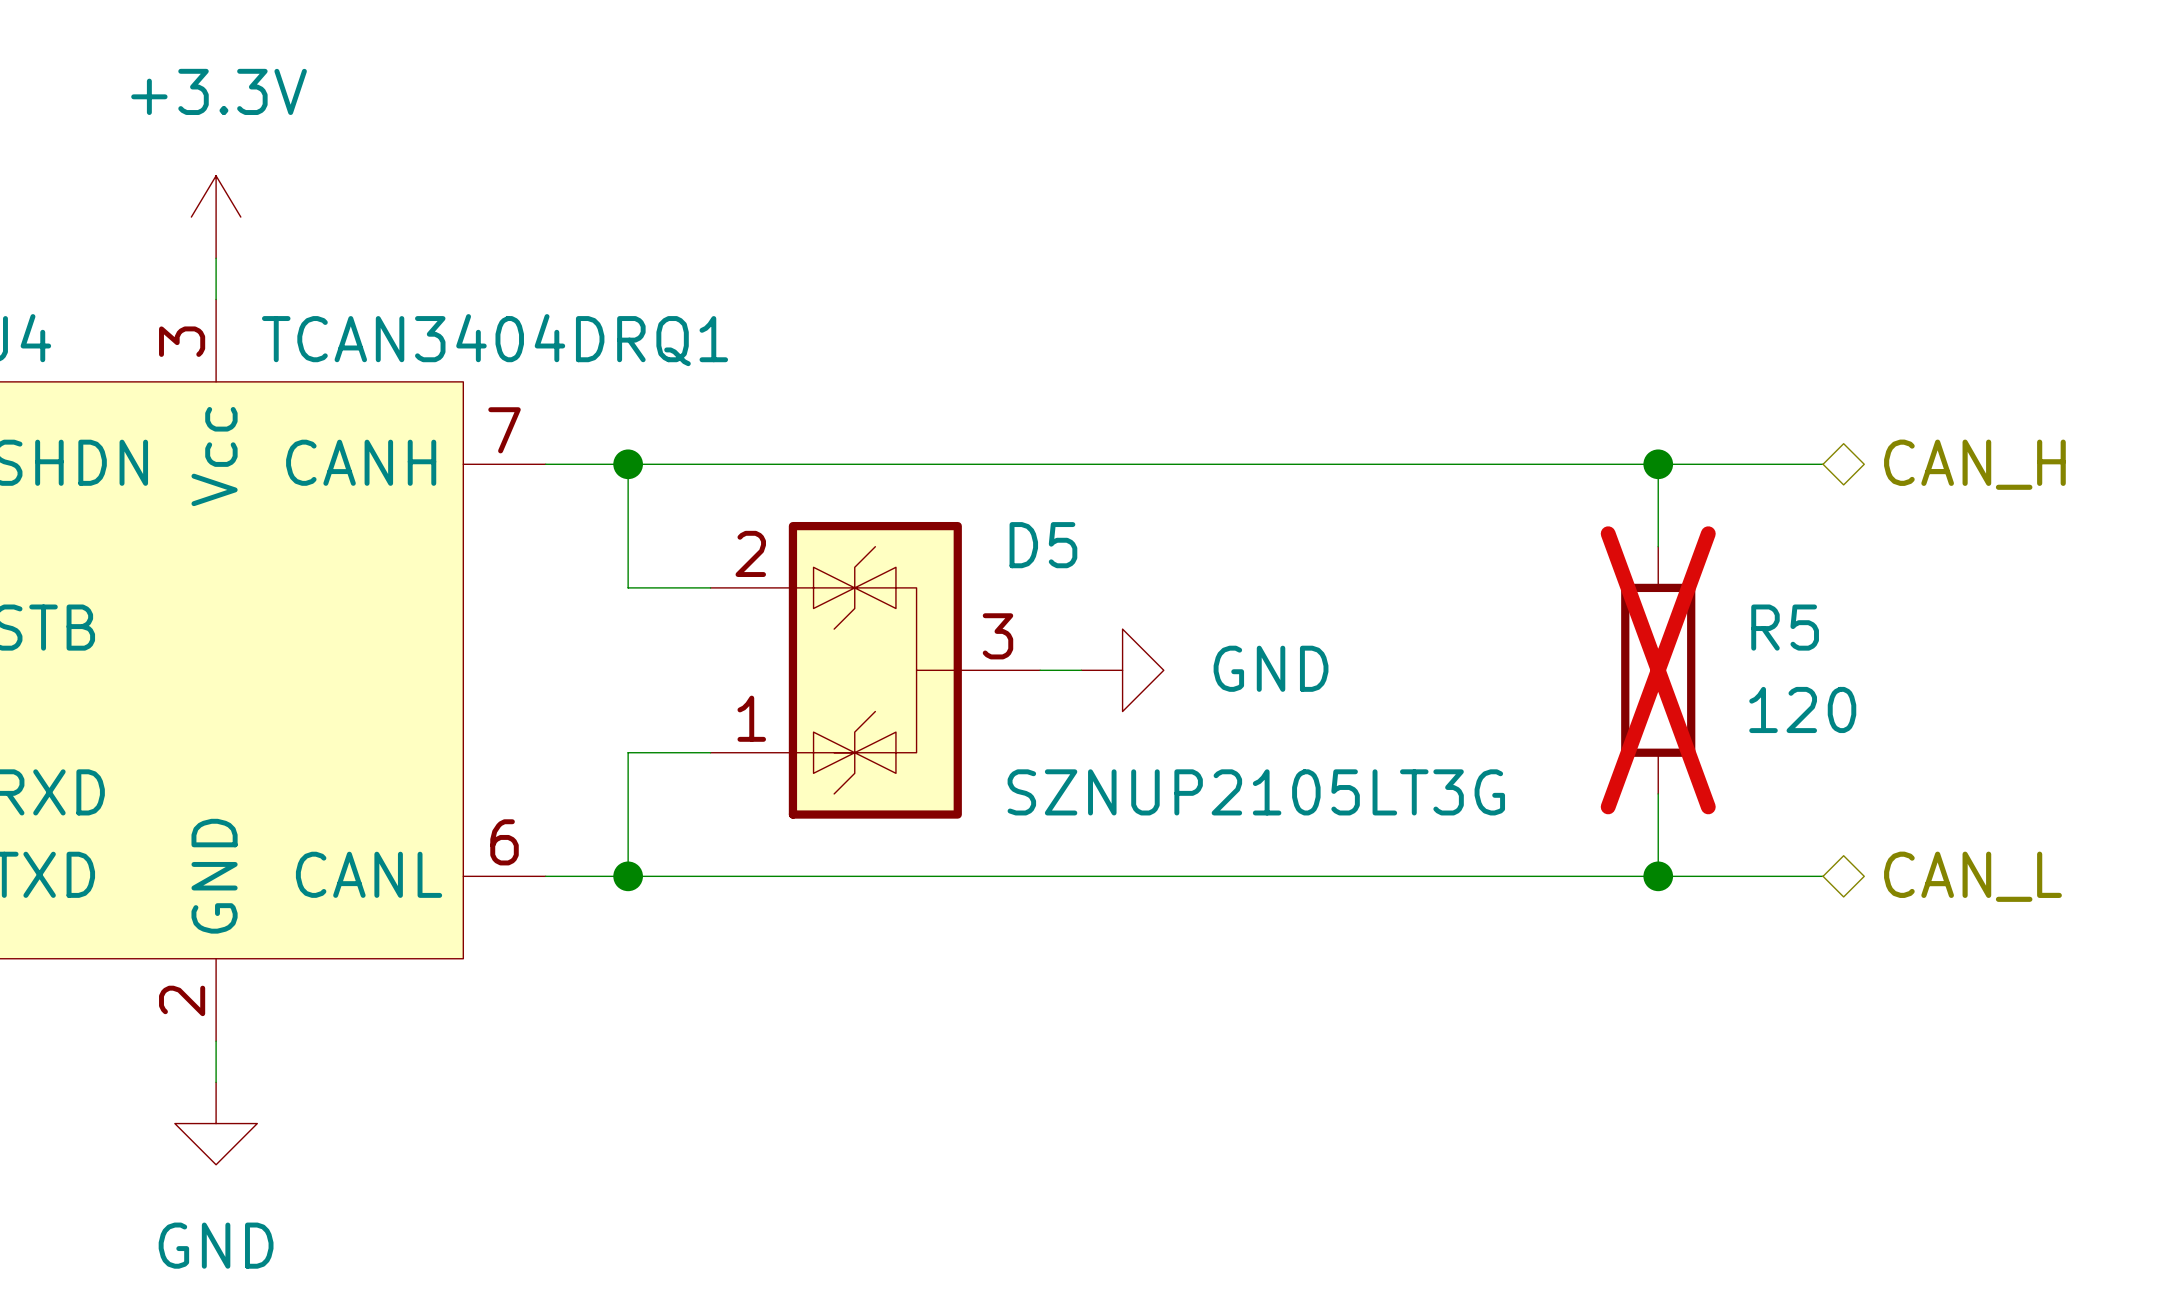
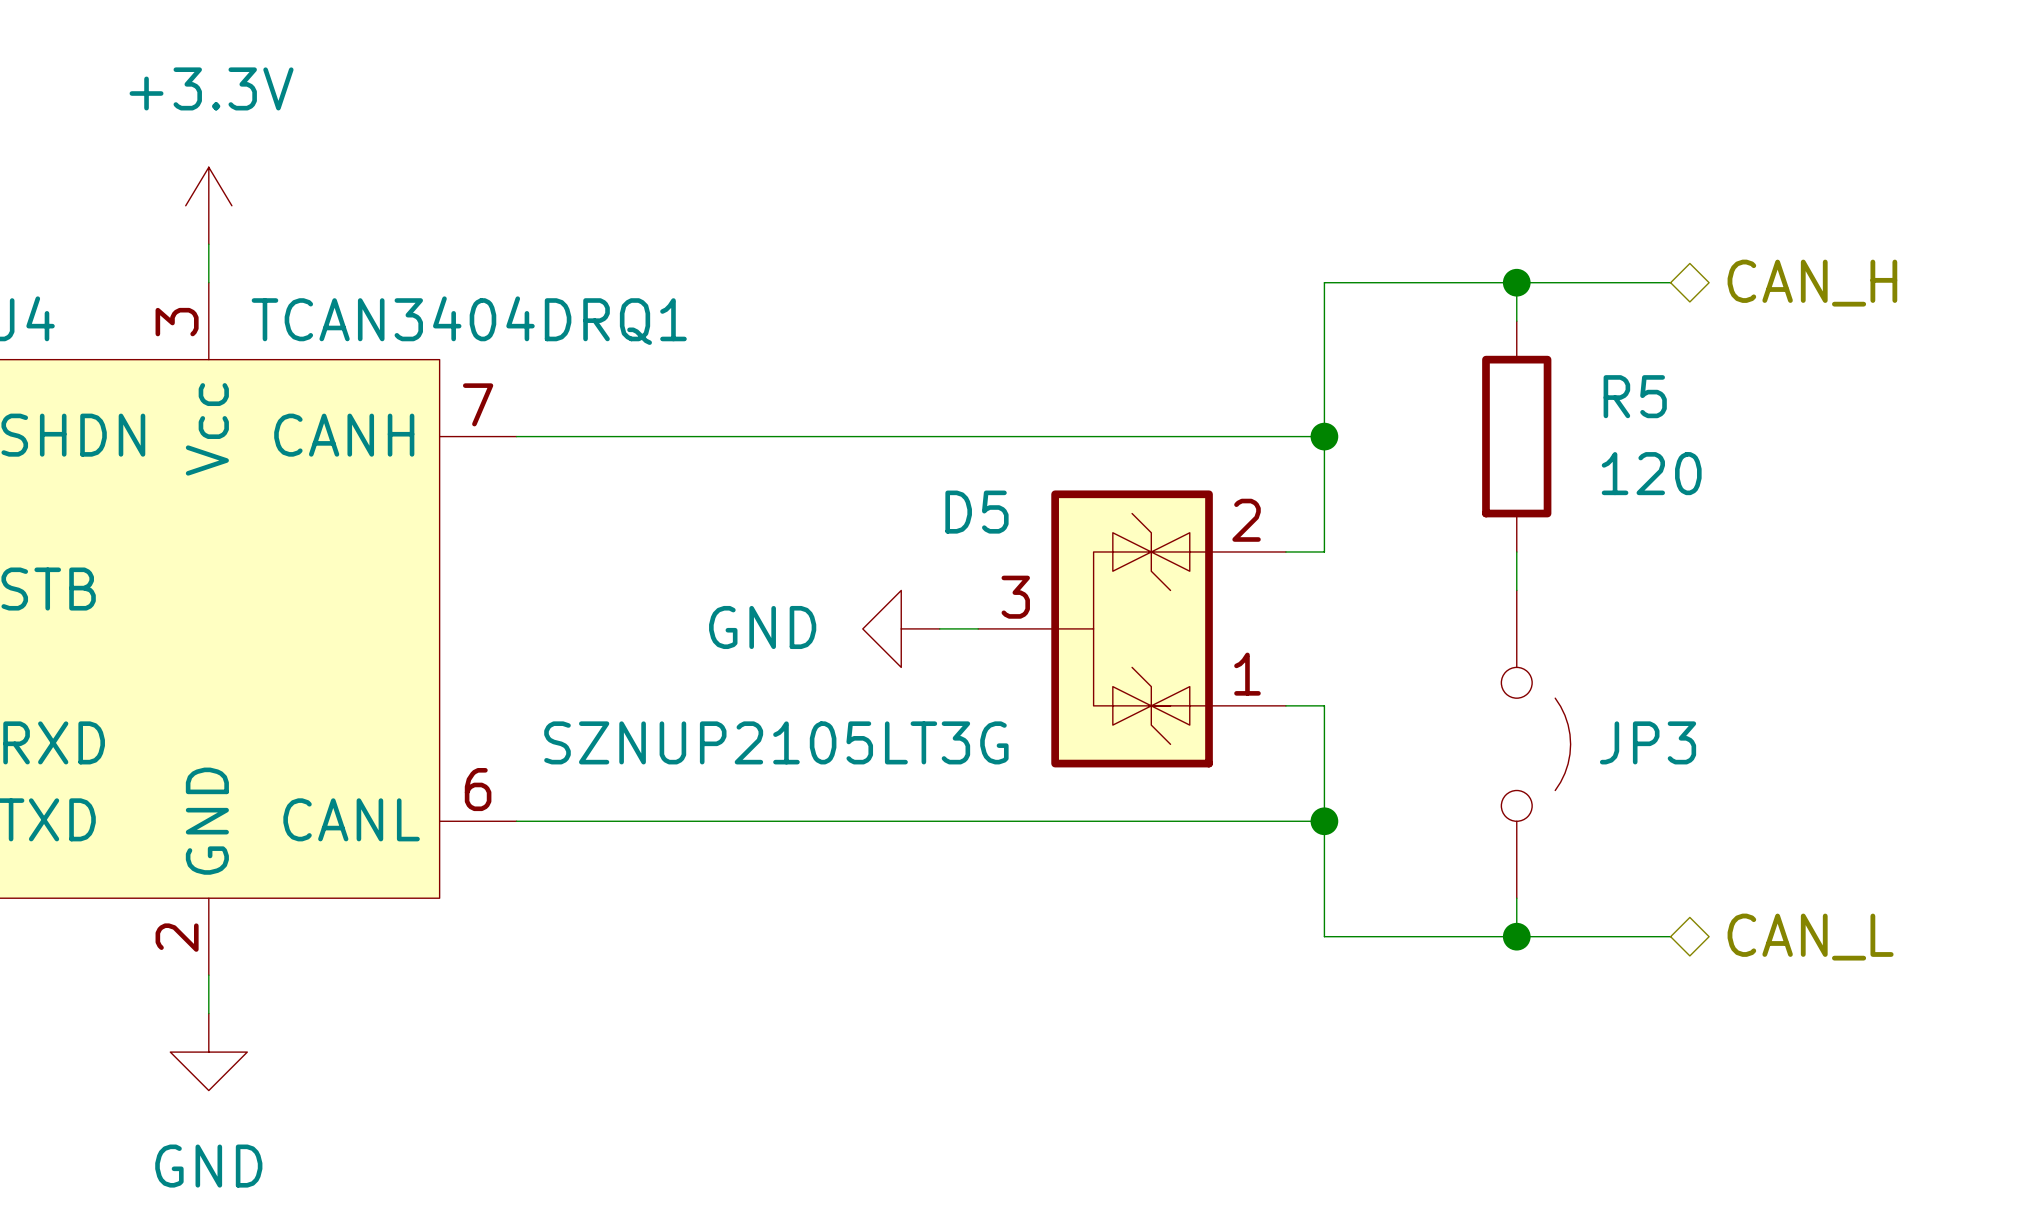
wire: none -> (1516, 282) (1516, 321)
junction: none -> (1516, 282)
wire: none -> (1670, 282) (1324, 282) (1324, 551) (1285, 551)
wire: (628, 464) (628, 587) (710, 587) -> none
junction: (628, 464) -> none
wire: (1411, 464) (1823, 464) -> none
junction: none -> (1324, 436)
wire: (1658, 464) (1658, 546) -> none
junction: (1658, 464) -> none
hierarchical label position: CAN_H (1974, 464) -> CAN_H (1812, 283)
wire: none -> (1516, 551) (1516, 590)
D5 flip: as is (875, 670) -> left-right (1132, 628)
D5 position: (875, 670) -> (1132, 628)
power symbol rotation: 0° (1122, 670) -> 180° (901, 628)
power symbol position: GND (1122, 670) -> GND (901, 628)
R5 position: (1658, 670) -> (1516, 436)
R5 do-not-place cross: (1658, 670) -> none
wire: (710, 752) (628, 752) (628, 876) -> none
wire: none -> (1285, 705) (1324, 705) (1324, 936) (1670, 936)
JP3: none -> (1535, 744)
wire: (1658, 793) (1658, 876) -> none
junction: (628, 876) -> none
wire: (1411, 876) (1823, 876) -> none
junction: none -> (1324, 821)
junction: (1658, 876) -> none
hierarchical label position: CAN_L (1972, 876) -> CAN_L (1810, 937)
wire: none -> (1516, 898) (1516, 936)
junction: none -> (1516, 936)

